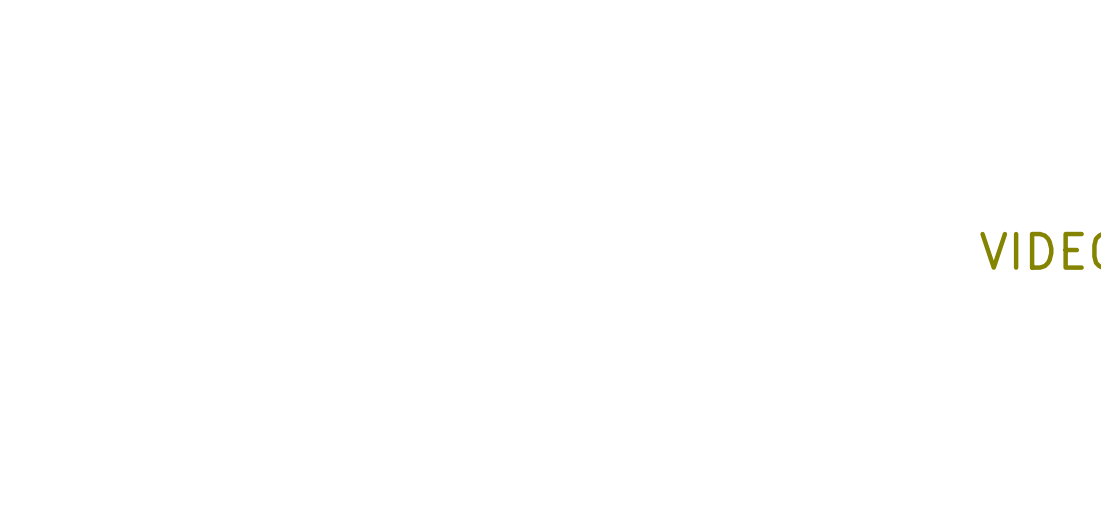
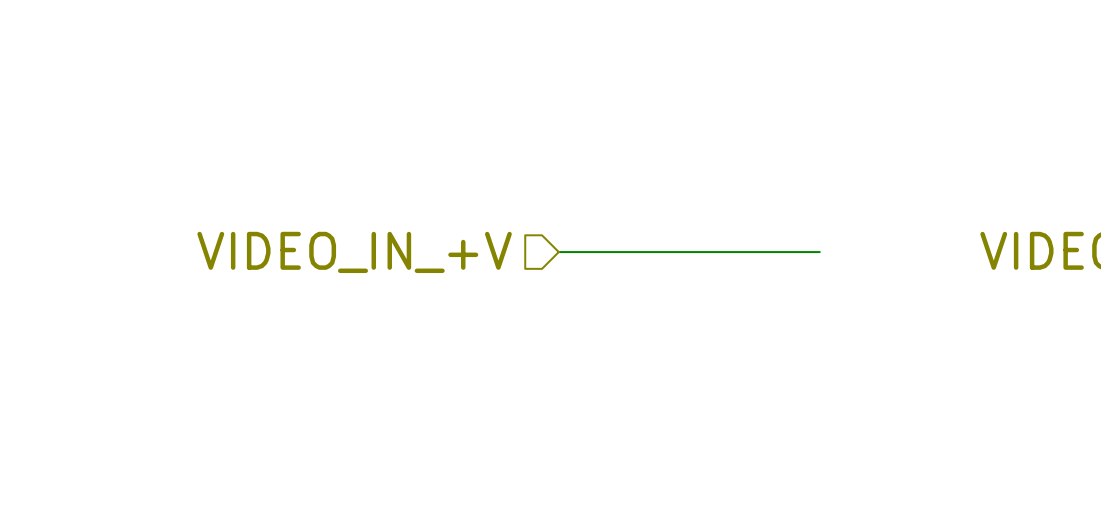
hierarchical label: none -> VIDEO_IN_+V (354, 252)
wire: none -> (558, 252) (819, 252)

